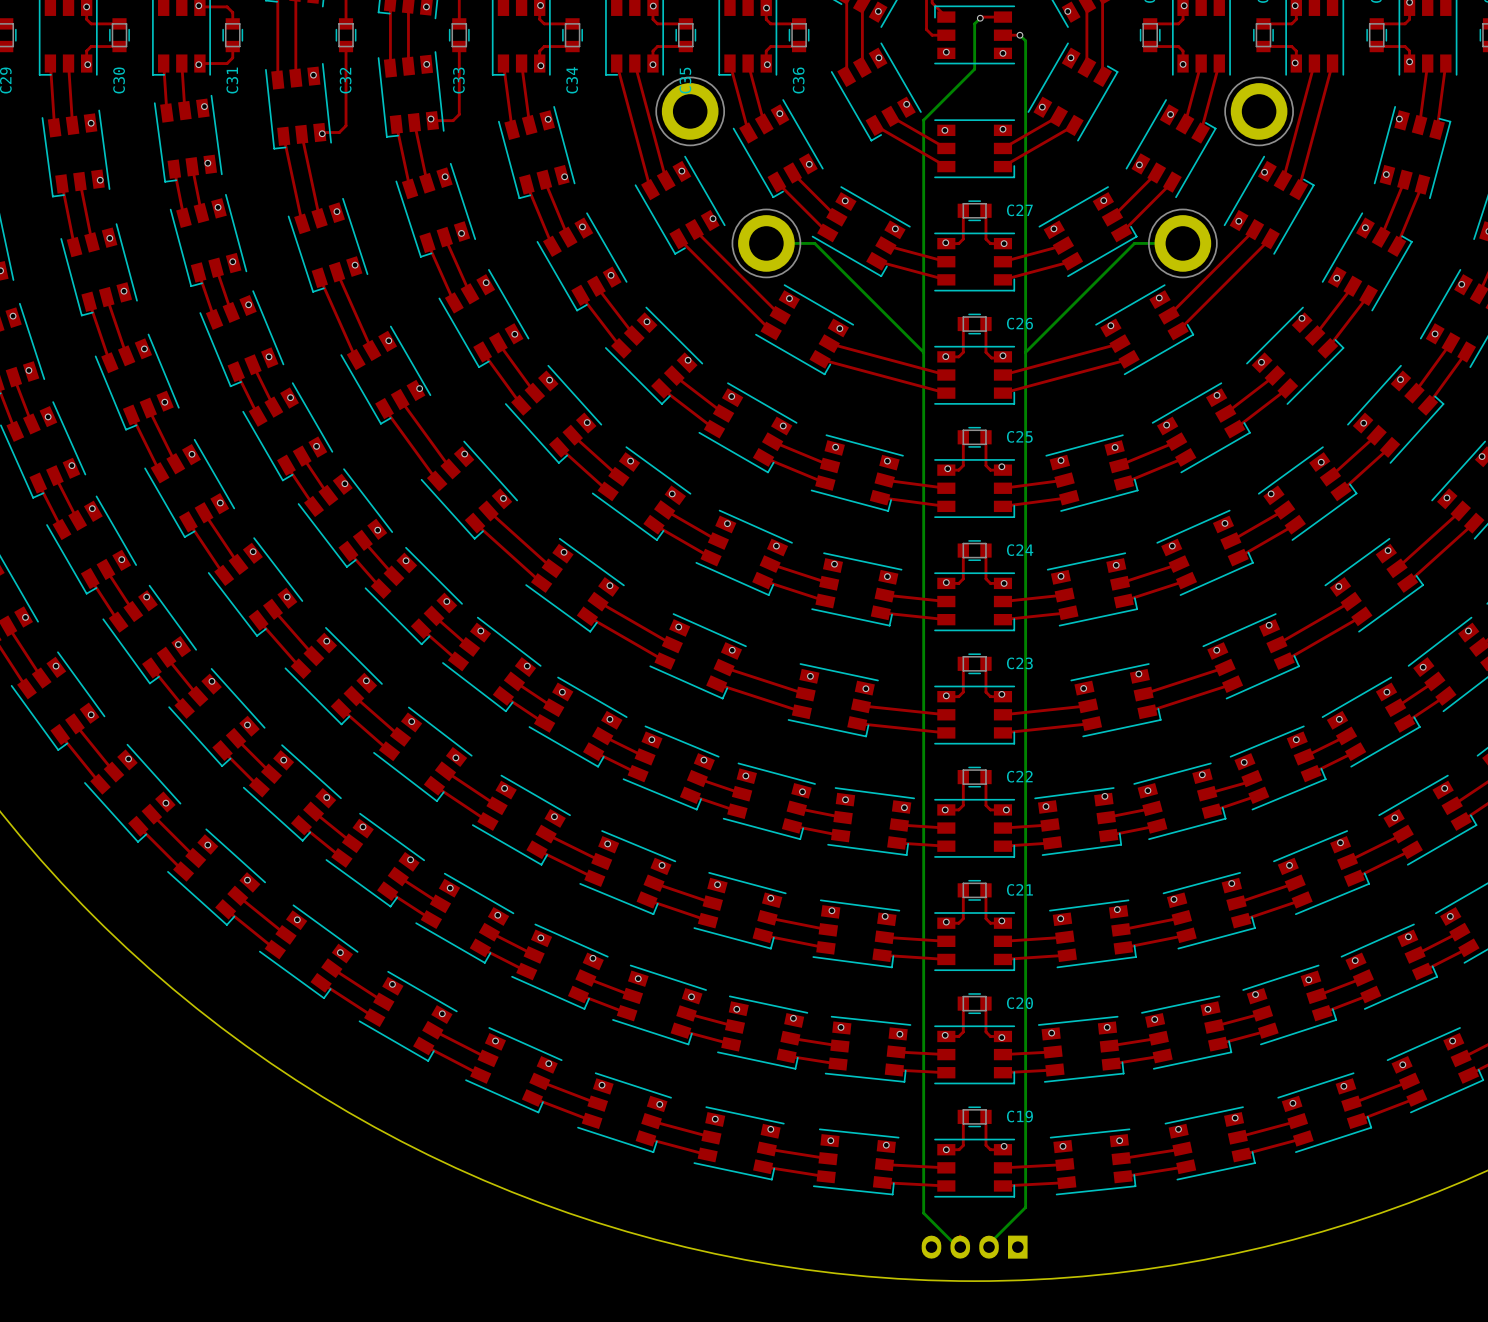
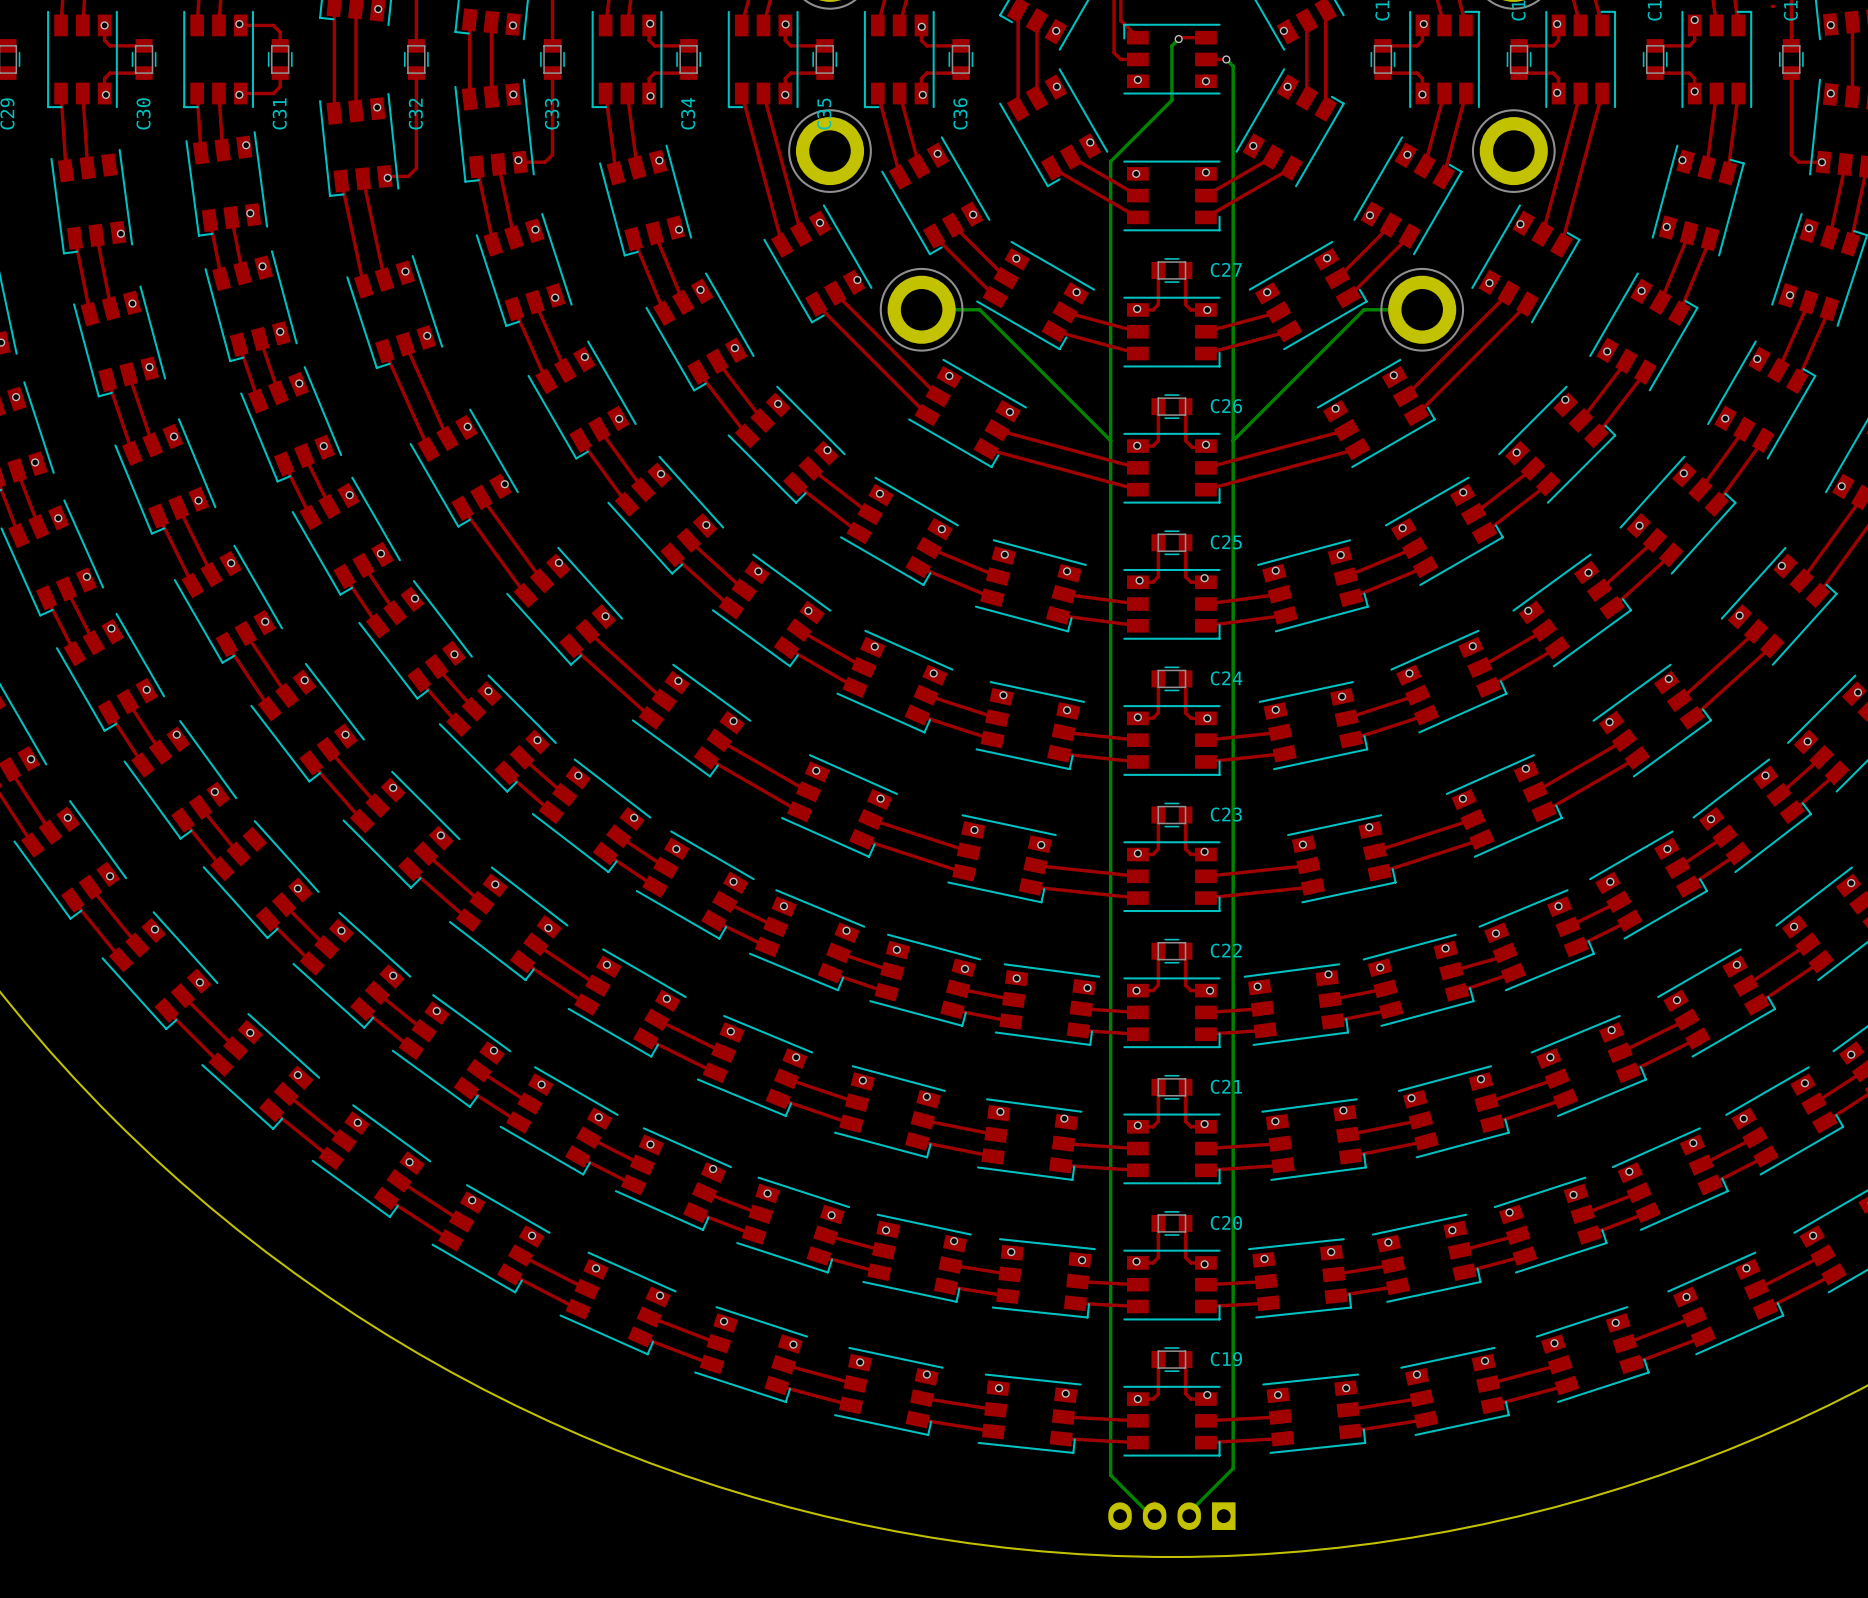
via: (91, 123) -> none
via: (211, 681) -> none

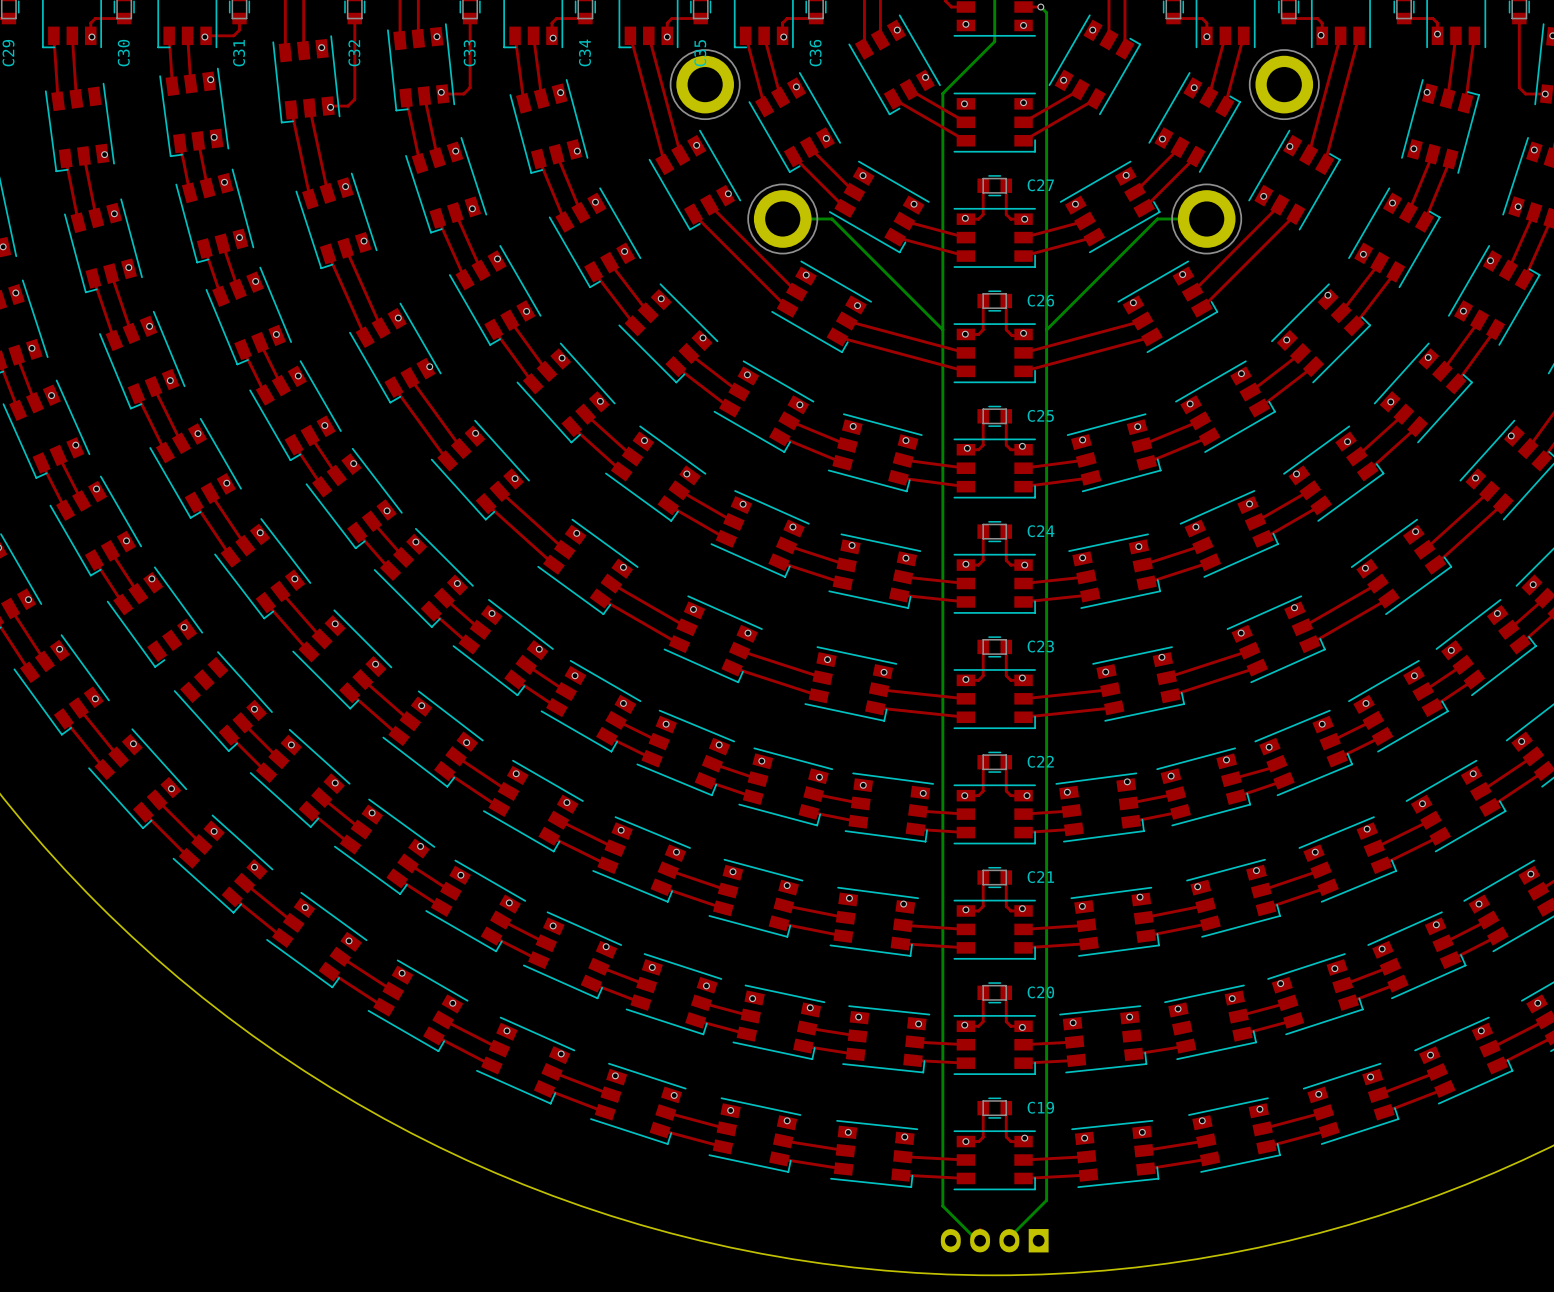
top track: (200, 807) (238, 854) -> none
top track: (183, 819) (222, 868) -> none
top track: (1393, 1265) (1333, 1274) -> none

